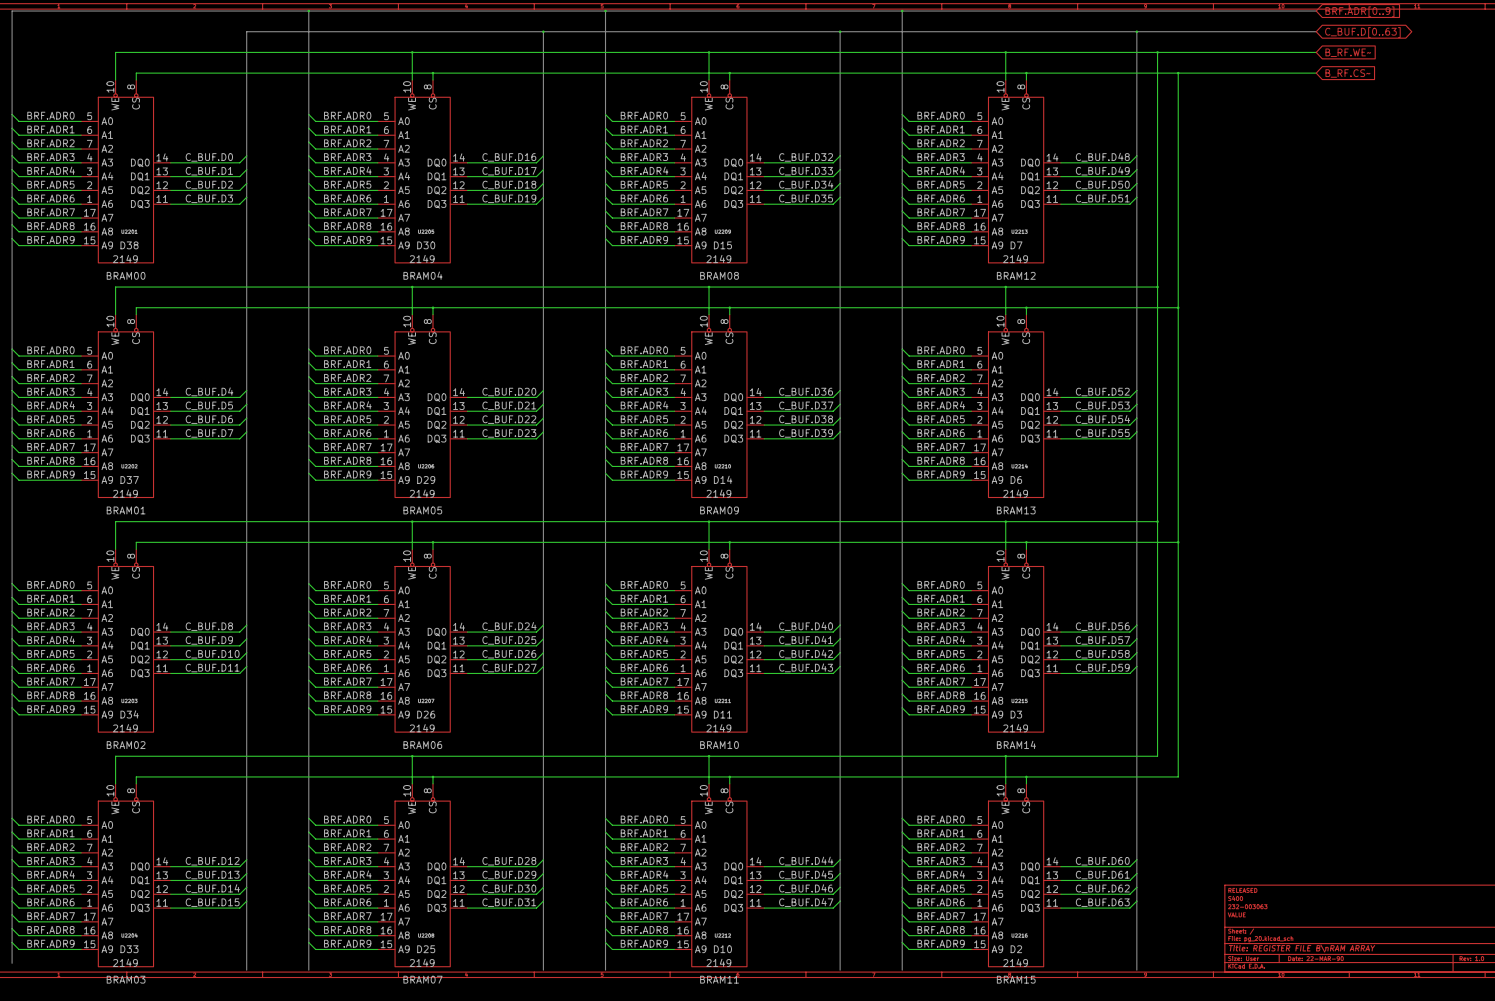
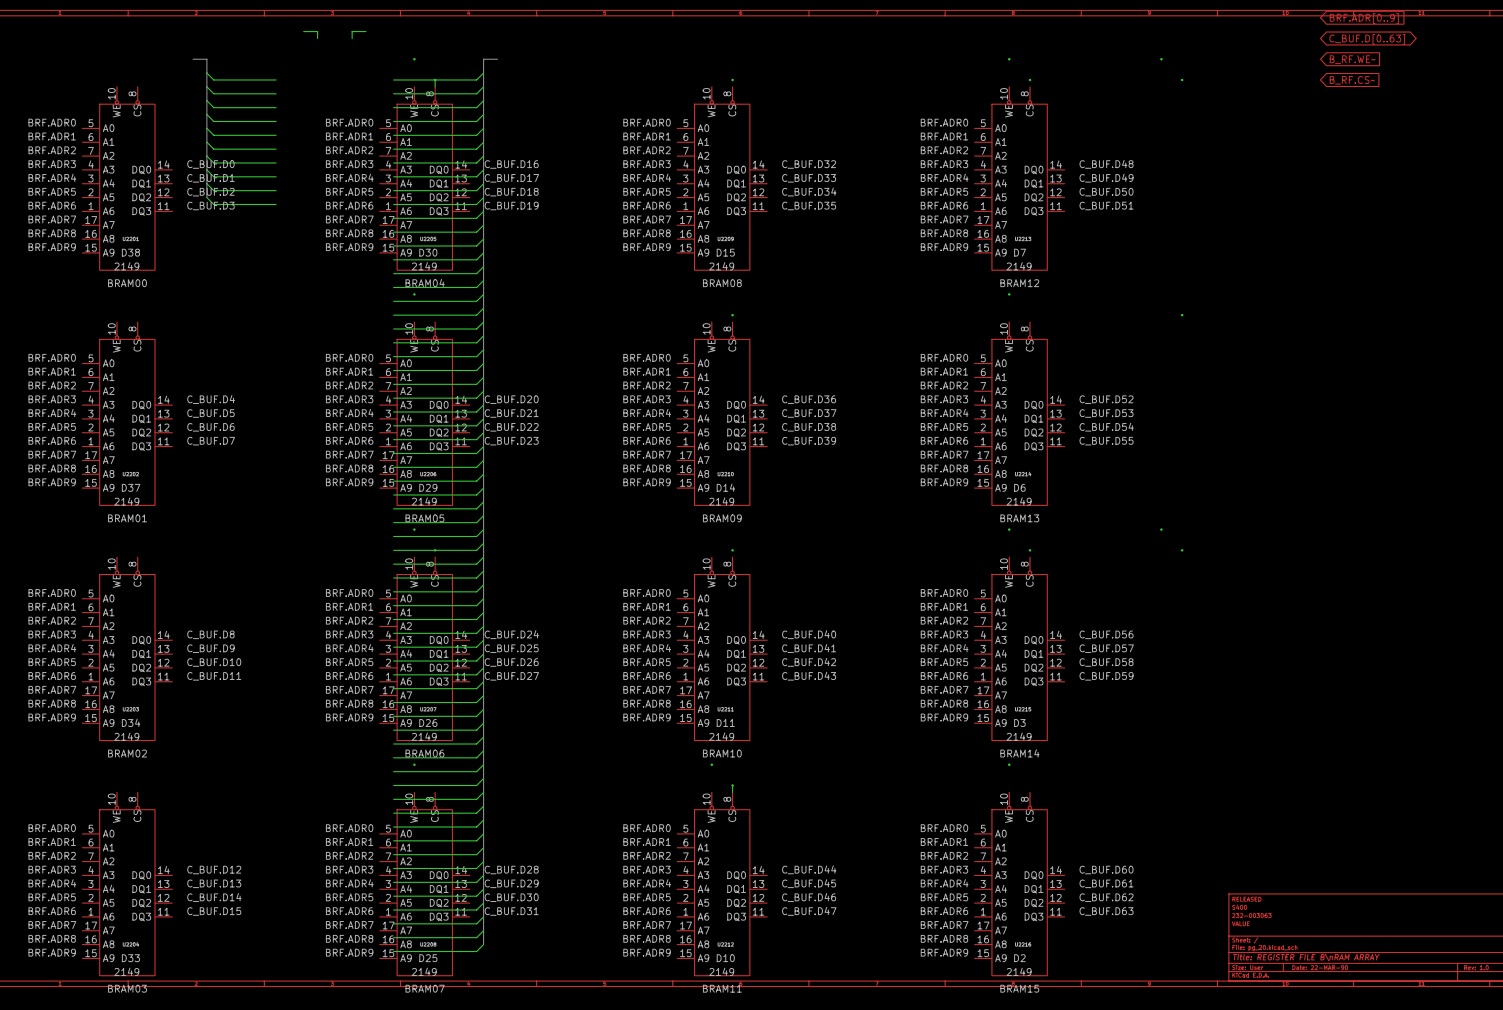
bus: (308, 11) (308, 970) -> none
junction: (308, 11) -> none
bus: (605, 11) (605, 970) -> none
junction: (605, 11) -> none
bus: (902, 11) (902, 970) -> none
junction: (902, 11) -> none
bus: (1316, 11) (12, 11) (12, 963) -> none
wire: none -> (303, 31) (317, 31) (317, 38)
wire: none -> (365, 31) (352, 31) (352, 38)
bus: (543, 31) (543, 970) -> none
junction: (543, 31) -> none
bus: (840, 31) (840, 970) -> none
junction: (840, 31) -> none
bus: (1136, 31) (1136, 970) -> none
junction: (1136, 31) -> none
bus: (1316, 31) (246, 31) (246, 970) -> none
bus: none -> (193, 59) (206, 59) (206, 197)
wire: (412, 52) (412, 80) -> none
bus: none -> (497, 59) (483, 59) (483, 944)
wire: (709, 52) (709, 80) -> none
junction: (709, 52) -> none
wire: (1005, 52) (1005, 80) -> none
wire: (1157, 52) (1157, 756) (115, 756) (115, 783) -> none
wire: (1316, 52) (115, 52) (115, 80) -> none
wire: (212, 73) (136, 73) (136, 80) -> (213, 79) (206, 73)
wire: (274, 73) (391, 73) -> none
wire: (474, 73) (1316, 73) -> (476, 79) (483, 73)
wire: (729, 73) (729, 80) -> none
wire: (1026, 73) (1026, 80) -> none
wire: (1178, 73) (1178, 776) (474, 776) -> (483, 778) (476, 785)
wire: none -> (206, 86) (213, 93) (276, 93)
wire: none -> (483, 86) (476, 93) (393, 93)
wire: none -> (206, 100) (213, 107) (276, 107)
wire: none -> (483, 100) (476, 107) (393, 107)
wire: none -> (206, 114) (213, 121) (276, 121)
wire: none -> (483, 114) (476, 121) (393, 121)
wire: (12, 114) (18, 121) (81, 121) -> none
wire: (308, 114) (315, 121) (377, 121) -> none
wire: (605, 114) (612, 121) (674, 121) -> none
wire: (902, 114) (909, 121) (971, 121) -> none
wire: none -> (206, 128) (213, 135) (276, 135)
wire: none -> (483, 128) (476, 135) (393, 135)
wire: (12, 128) (18, 135) (81, 135) -> none
wire: (308, 128) (315, 135) (377, 135) -> none
wire: (605, 128) (612, 135) (674, 135) -> none
wire: (902, 128) (909, 135) (971, 135) -> none
wire: none -> (206, 142) (213, 149) (276, 149)
wire: none -> (483, 142) (476, 149) (393, 149)
wire: (12, 142) (18, 149) (81, 149) -> none
wire: (308, 142) (315, 149) (377, 149) -> none
wire: (605, 142) (612, 149) (674, 149) -> none
wire: (902, 142) (909, 149) (971, 149) -> none
wire: none -> (206, 156) (213, 162) (276, 162)
wire: none -> (483, 156) (476, 162) (393, 162)
wire: (12, 155) (18, 162) (81, 162) -> none
wire: (246, 155) (239, 162) (170, 162) -> none
wire: (308, 155) (315, 162) (377, 162) -> none
wire: (543, 155) (536, 162) (467, 162) -> none
wire: (605, 155) (612, 162) (674, 162) -> none
wire: (840, 155) (833, 162) (764, 162) -> none
wire: (902, 155) (909, 162) (971, 162) -> none
wire: (1136, 155) (1129, 162) (1060, 162) -> none
wire: none -> (206, 169) (213, 176) (276, 176)
wire: none -> (483, 169) (476, 176) (393, 176)
wire: (12, 169) (18, 176) (81, 176) -> none
wire: (246, 169) (239, 176) (170, 176) -> none
wire: (308, 169) (315, 176) (377, 176) -> none
wire: (543, 169) (536, 176) (467, 176) -> none
wire: (605, 169) (612, 176) (674, 176) -> none
wire: (840, 169) (833, 176) (764, 176) -> none
wire: (902, 169) (909, 176) (971, 176) -> none
wire: (1136, 169) (1129, 176) (1060, 176) -> none
wire: none -> (206, 183) (213, 190) (276, 190)
wire: none -> (483, 183) (476, 190) (393, 190)
wire: (12, 183) (18, 190) (81, 190) -> none
wire: (246, 183) (239, 190) (170, 190) -> none
wire: (308, 183) (315, 190) (377, 190) -> none
wire: (543, 183) (536, 190) (467, 190) -> none
wire: (605, 183) (612, 190) (674, 190) -> none
wire: (840, 183) (833, 190) (764, 190) -> none
wire: (902, 183) (909, 190) (971, 190) -> none
wire: (1136, 183) (1129, 190) (1060, 190) -> none
wire: none -> (206, 197) (213, 204) (276, 204)
wire: none -> (483, 197) (476, 204) (393, 204)
wire: (12, 197) (18, 204) (81, 204) -> none
wire: (246, 197) (239, 204) (170, 204) -> none
wire: (308, 197) (315, 204) (377, 204) -> none
wire: (543, 197) (536, 204) (467, 204) -> none
wire: (605, 197) (612, 204) (674, 204) -> none
wire: (840, 197) (833, 204) (764, 204) -> none
wire: (902, 197) (909, 204) (971, 204) -> none
wire: (1136, 197) (1129, 204) (1060, 204) -> none
wire: none -> (483, 211) (476, 218) (393, 218)
wire: (12, 211) (18, 218) (81, 218) -> none
wire: (308, 211) (315, 218) (377, 218) -> none
wire: (605, 211) (612, 218) (674, 218) -> none
wire: (902, 211) (909, 218) (971, 218) -> none
wire: none -> (483, 225) (476, 232) (393, 232)
wire: (12, 224) (18, 231) (81, 231) -> none
wire: (308, 224) (315, 231) (377, 231) -> none
wire: (605, 224) (612, 231) (674, 231) -> none
wire: (902, 224) (909, 231) (971, 231) -> none
wire: none -> (483, 239) (476, 245) (393, 245)
wire: (12, 238) (18, 245) (81, 245) -> none
wire: (308, 238) (315, 245) (377, 245) -> none
wire: (605, 238) (612, 245) (674, 245) -> none
wire: (902, 238) (909, 245) (971, 245) -> none
wire: none -> (483, 252) (476, 259) (393, 259)
wire: none -> (483, 266) (476, 273) (393, 273)
wire: none -> (483, 280) (476, 287) (393, 287)
wire: (412, 287) (412, 314) -> none
wire: none -> (483, 294) (476, 301) (393, 301)
wire: (709, 287) (709, 314) -> none
wire: (1005, 287) (1005, 314) -> none
wire: (1157, 287) (115, 287) (115, 314) -> none
junction: (1157, 287) -> none
wire: (391, 307) (136, 307) (136, 314) -> none
wire: (433, 307) (433, 314) -> none
wire: (474, 307) (1178, 307) -> (476, 315) (483, 308)
wire: (729, 307) (729, 314) -> none
wire: (1026, 307) (1026, 314) -> none
wire: none -> (483, 322) (476, 328) (393, 328)
wire: none -> (483, 335) (476, 342) (393, 342)
wire: none -> (483, 349) (476, 356) (393, 356)
wire: (12, 349) (18, 356) (81, 356) -> none
wire: (308, 349) (315, 356) (377, 356) -> none
wire: (605, 349) (612, 356) (674, 356) -> none
wire: (902, 349) (909, 356) (971, 356) -> none
wire: none -> (483, 363) (476, 370) (393, 370)
wire: (12, 362) (18, 369) (81, 369) -> none
wire: (308, 362) (315, 369) (377, 369) -> none
wire: (605, 362) (612, 369) (674, 369) -> none
wire: (902, 362) (909, 369) (971, 369) -> none
wire: none -> (483, 377) (476, 384) (393, 384)
wire: (12, 376) (18, 383) (81, 383) -> none
wire: (308, 376) (315, 383) (377, 383) -> none
wire: (605, 376) (612, 383) (674, 383) -> none
wire: (902, 376) (909, 383) (971, 383) -> none
wire: none -> (483, 391) (476, 398) (393, 398)
wire: (12, 390) (18, 397) (81, 397) -> none
wire: (246, 390) (239, 397) (170, 397) -> none
wire: (308, 390) (315, 397) (377, 397) -> none
wire: (543, 390) (536, 397) (467, 397) -> none
wire: (605, 390) (612, 397) (674, 397) -> none
wire: (840, 390) (833, 397) (764, 397) -> none
wire: (902, 390) (909, 397) (971, 397) -> none
wire: (1136, 390) (1129, 397) (1060, 397) -> none
wire: none -> (483, 405) (476, 411) (393, 411)
wire: (12, 404) (18, 411) (81, 411) -> none
wire: (246, 404) (239, 411) (170, 411) -> none
wire: (308, 404) (315, 411) (377, 411) -> none
wire: (543, 404) (536, 411) (467, 411) -> none
wire: (605, 404) (612, 411) (674, 411) -> none
wire: (840, 404) (833, 411) (764, 411) -> none
wire: (902, 404) (909, 411) (971, 411) -> none
wire: (1136, 404) (1129, 411) (1060, 411) -> none
wire: none -> (483, 418) (476, 425) (393, 425)
wire: (12, 418) (18, 425) (81, 425) -> none
wire: (246, 418) (239, 425) (170, 425) -> none
wire: (308, 418) (315, 425) (377, 425) -> none
wire: (543, 418) (536, 425) (467, 425) -> none
wire: (605, 418) (612, 425) (674, 425) -> none
wire: (840, 418) (833, 425) (764, 425) -> none
wire: (902, 418) (909, 425) (971, 425) -> none
wire: (1136, 418) (1129, 425) (1060, 425) -> none
wire: none -> (483, 432) (476, 439) (393, 439)
wire: (12, 431) (18, 438) (81, 438) -> none
wire: (246, 431) (239, 438) (170, 438) -> none
wire: (308, 431) (315, 438) (377, 438) -> none
wire: (543, 431) (536, 438) (467, 438) -> none
wire: (605, 431) (612, 438) (674, 438) -> none
wire: (840, 431) (833, 438) (764, 438) -> none
wire: (902, 431) (909, 438) (971, 438) -> none
wire: (1136, 431) (1129, 438) (1060, 438) -> none
wire: none -> (483, 446) (476, 453) (393, 453)
wire: (12, 445) (18, 452) (81, 452) -> none
wire: (308, 445) (315, 452) (377, 452) -> none
wire: (605, 445) (612, 452) (674, 452) -> none
wire: (902, 445) (909, 452) (971, 452) -> none
wire: none -> (483, 460) (476, 467) (393, 467)
wire: (12, 459) (18, 466) (81, 466) -> none
wire: (308, 459) (315, 466) (377, 466) -> none
wire: (605, 459) (612, 466) (674, 466) -> none
wire: (902, 459) (909, 466) (971, 466) -> none
wire: none -> (483, 474) (476, 481) (393, 481)
wire: (12, 473) (18, 480) (81, 480) -> none
wire: (308, 473) (315, 480) (377, 480) -> none
wire: (605, 473) (612, 480) (674, 480) -> none
wire: (902, 473) (909, 480) (971, 480) -> none
wire: none -> (483, 488) (476, 495) (393, 495)
wire: none -> (483, 501) (476, 508) (393, 508)
wire: none -> (483, 515) (476, 522) (393, 522)
wire: (412, 521) (412, 549) -> none
wire: none -> (483, 529) (476, 536) (393, 536)
wire: (709, 521) (709, 549) -> none
wire: (1005, 521) (1005, 549) -> none
wire: (1157, 521) (115, 521) (115, 549) -> none
wire: (391, 542) (136, 542) (136, 549) -> none
wire: (433, 542) (433, 549) -> none
wire: (474, 542) (1178, 542) -> (476, 550) (483, 543)
wire: (729, 542) (729, 549) -> none
wire: (1026, 542) (1026, 549) -> none
wire: none -> (483, 557) (476, 564) (393, 564)
wire: none -> (483, 571) (476, 578) (393, 578)
wire: none -> (483, 584) (476, 591) (393, 591)
wire: (12, 583) (18, 590) (81, 590) -> none
wire: (308, 583) (315, 590) (377, 590) -> none
wire: (605, 583) (612, 590) (674, 590) -> none
wire: (902, 583) (909, 590) (971, 590) -> none
wire: none -> (483, 598) (476, 605) (393, 605)
wire: (12, 597) (18, 604) (81, 604) -> none
wire: (308, 597) (315, 604) (377, 604) -> none
wire: (605, 597) (612, 604) (674, 604) -> none
wire: (902, 597) (909, 604) (971, 604) -> none
wire: none -> (483, 612) (476, 619) (393, 619)
wire: (12, 611) (18, 618) (81, 618) -> none
wire: (308, 611) (315, 618) (377, 618) -> none
wire: (605, 611) (612, 618) (674, 618) -> none
wire: (902, 611) (909, 618) (971, 618) -> none
wire: none -> (483, 626) (476, 633) (393, 633)
wire: (12, 625) (18, 632) (81, 632) -> none
wire: (246, 625) (239, 632) (170, 632) -> none
wire: (308, 625) (315, 632) (377, 632) -> none
wire: (543, 625) (536, 632) (467, 632) -> none
wire: (605, 625) (612, 632) (674, 632) -> none
wire: (840, 625) (833, 632) (764, 632) -> none
wire: (902, 625) (909, 632) (971, 632) -> none
wire: (1136, 625) (1129, 632) (1060, 632) -> none
wire: none -> (483, 640) (476, 647) (393, 647)
wire: (12, 638) (18, 645) (81, 645) -> none
wire: (246, 638) (239, 645) (170, 645) -> none
wire: (308, 638) (315, 645) (377, 645) -> none
wire: (543, 638) (536, 645) (467, 645) -> none
wire: (605, 638) (612, 645) (674, 645) -> none
wire: (840, 638) (833, 645) (764, 645) -> none
wire: (902, 638) (909, 645) (971, 645) -> none
wire: (1136, 638) (1129, 645) (1060, 645) -> none
wire: none -> (483, 654) (476, 661) (393, 661)
wire: (12, 652) (18, 659) (81, 659) -> none
wire: (246, 652) (239, 659) (170, 659) -> none
wire: (308, 652) (315, 659) (377, 659) -> none
wire: (543, 652) (536, 659) (467, 659) -> none
wire: (605, 652) (612, 659) (674, 659) -> none
wire: (840, 652) (833, 659) (764, 659) -> none
wire: (902, 652) (909, 659) (971, 659) -> none
wire: (1136, 652) (1129, 659) (1060, 659) -> none
wire: none -> (483, 667) (476, 674) (393, 674)
wire: (12, 666) (18, 673) (81, 673) -> none
wire: (246, 666) (239, 673) (170, 673) -> none
wire: (308, 666) (315, 673) (377, 673) -> none
wire: (543, 666) (536, 673) (467, 673) -> none
wire: (605, 666) (612, 673) (674, 673) -> none
wire: (840, 666) (833, 673) (764, 673) -> none
wire: (902, 666) (909, 673) (971, 673) -> none
wire: (1136, 666) (1129, 673) (1060, 673) -> none
wire: none -> (483, 681) (476, 688) (393, 688)
wire: (12, 680) (18, 687) (81, 687) -> none
wire: (308, 680) (315, 687) (377, 687) -> none
wire: (605, 680) (612, 687) (674, 687) -> none
wire: (902, 680) (909, 687) (971, 687) -> none
wire: none -> (483, 695) (476, 702) (393, 702)
wire: (12, 694) (18, 701) (81, 701) -> none
wire: (308, 694) (315, 701) (377, 701) -> none
wire: (605, 694) (612, 701) (674, 701) -> none
wire: (902, 694) (909, 701) (971, 701) -> none
wire: none -> (483, 709) (476, 716) (393, 716)
wire: (12, 707) (18, 714) (81, 714) -> none
wire: (308, 707) (315, 714) (377, 714) -> none
wire: (605, 707) (612, 714) (674, 714) -> none
wire: (902, 707) (909, 714) (971, 714) -> none
wire: none -> (483, 723) (476, 730) (393, 730)
wire: none -> (483, 737) (476, 744) (393, 744)
wire: none -> (483, 750) (476, 757) (393, 757)
wire: (412, 756) (412, 783) -> none
wire: none -> (483, 764) (476, 771) (393, 771)
wire: (709, 756) (709, 783) -> none
wire: (1005, 756) (1005, 783) -> none
wire: (391, 776) (136, 776) (136, 783) -> none
wire: (433, 776) (433, 783) -> none
wire: (1026, 776) (1026, 783) -> none
junction: (1026, 776) -> none
wire: none -> (483, 792) (476, 799) (393, 799)
wire: none -> (483, 806) (476, 813) (393, 813)
wire: none -> (483, 820) (476, 827) (393, 827)
wire: (12, 818) (18, 825) (81, 825) -> none
wire: (308, 818) (315, 825) (377, 825) -> none
wire: (605, 818) (612, 825) (674, 825) -> none
wire: (902, 818) (909, 825) (971, 825) -> none
wire: none -> (483, 833) (476, 840) (393, 840)
wire: (12, 832) (18, 839) (81, 839) -> none
wire: (308, 832) (315, 839) (377, 839) -> none
wire: (605, 832) (612, 839) (674, 839) -> none
wire: (902, 832) (909, 839) (971, 839) -> none
wire: none -> (483, 847) (476, 854) (393, 854)
wire: (12, 845) (18, 852) (81, 852) -> none
wire: (308, 845) (315, 852) (377, 852) -> none
wire: (605, 845) (612, 852) (674, 852) -> none
wire: (902, 845) (909, 852) (971, 852) -> none
wire: none -> (483, 861) (476, 868) (393, 868)
wire: (12, 859) (18, 866) (81, 866) -> none
wire: (246, 859) (239, 866) (170, 866) -> none
wire: (308, 859) (315, 866) (377, 866) -> none
wire: (543, 859) (536, 866) (467, 866) -> none
wire: (605, 859) (612, 866) (674, 866) -> none
wire: (840, 859) (833, 866) (764, 866) -> none
wire: (902, 859) (909, 866) (971, 866) -> none
wire: (1136, 859) (1129, 866) (1060, 866) -> none
wire: none -> (483, 875) (476, 882) (393, 882)
wire: (12, 873) (18, 880) (81, 880) -> none
wire: (246, 873) (239, 880) (170, 880) -> none
wire: (308, 873) (315, 880) (377, 880) -> none
wire: (543, 873) (536, 880) (467, 880) -> none
wire: (605, 873) (612, 880) (674, 880) -> none
wire: (840, 873) (833, 880) (764, 880) -> none
wire: (902, 873) (909, 880) (971, 880) -> none
wire: (1136, 873) (1129, 880) (1060, 880) -> none
wire: none -> (483, 889) (476, 896) (393, 896)
wire: (12, 887) (18, 894) (81, 894) -> none
wire: (246, 887) (239, 894) (170, 894) -> none
wire: (308, 887) (315, 894) (377, 894) -> none
wire: (543, 887) (536, 894) (467, 894) -> none
wire: (605, 887) (612, 894) (674, 894) -> none
wire: (840, 887) (833, 894) (764, 894) -> none
wire: (902, 887) (909, 894) (971, 894) -> none
wire: (1136, 887) (1129, 894) (1060, 894) -> none
wire: none -> (483, 903) (476, 910) (393, 910)
wire: (12, 901) (18, 908) (81, 908) -> none
wire: (246, 901) (239, 908) (170, 908) -> none
wire: (308, 901) (315, 908) (377, 908) -> none
wire: (543, 901) (536, 908) (467, 908) -> none
wire: (605, 901) (612, 908) (674, 908) -> none
wire: (840, 901) (833, 908) (764, 908) -> none
wire: (902, 901) (909, 908) (971, 908) -> none
wire: (1136, 901) (1129, 908) (1060, 908) -> none
wire: none -> (483, 916) (476, 923) (393, 923)
wire: (12, 914) (18, 921) (81, 921) -> none
wire: (308, 914) (315, 921) (377, 921) -> none
wire: (605, 914) (612, 921) (674, 921) -> none
wire: (902, 914) (909, 921) (971, 921) -> none
wire: none -> (483, 930) (476, 937) (393, 937)
wire: (12, 928) (18, 935) (81, 935) -> none
wire: (308, 928) (315, 935) (377, 935) -> none
wire: (605, 928) (612, 935) (674, 935) -> none
wire: (902, 928) (909, 935) (971, 935) -> none
wire: none -> (483, 944) (476, 951) (393, 951)
wire: (12, 942) (18, 949) (81, 949) -> none
wire: (308, 942) (315, 949) (377, 949) -> none
wire: (605, 942) (612, 949) (674, 949) -> none
wire: (902, 942) (909, 949) (971, 949) -> none

